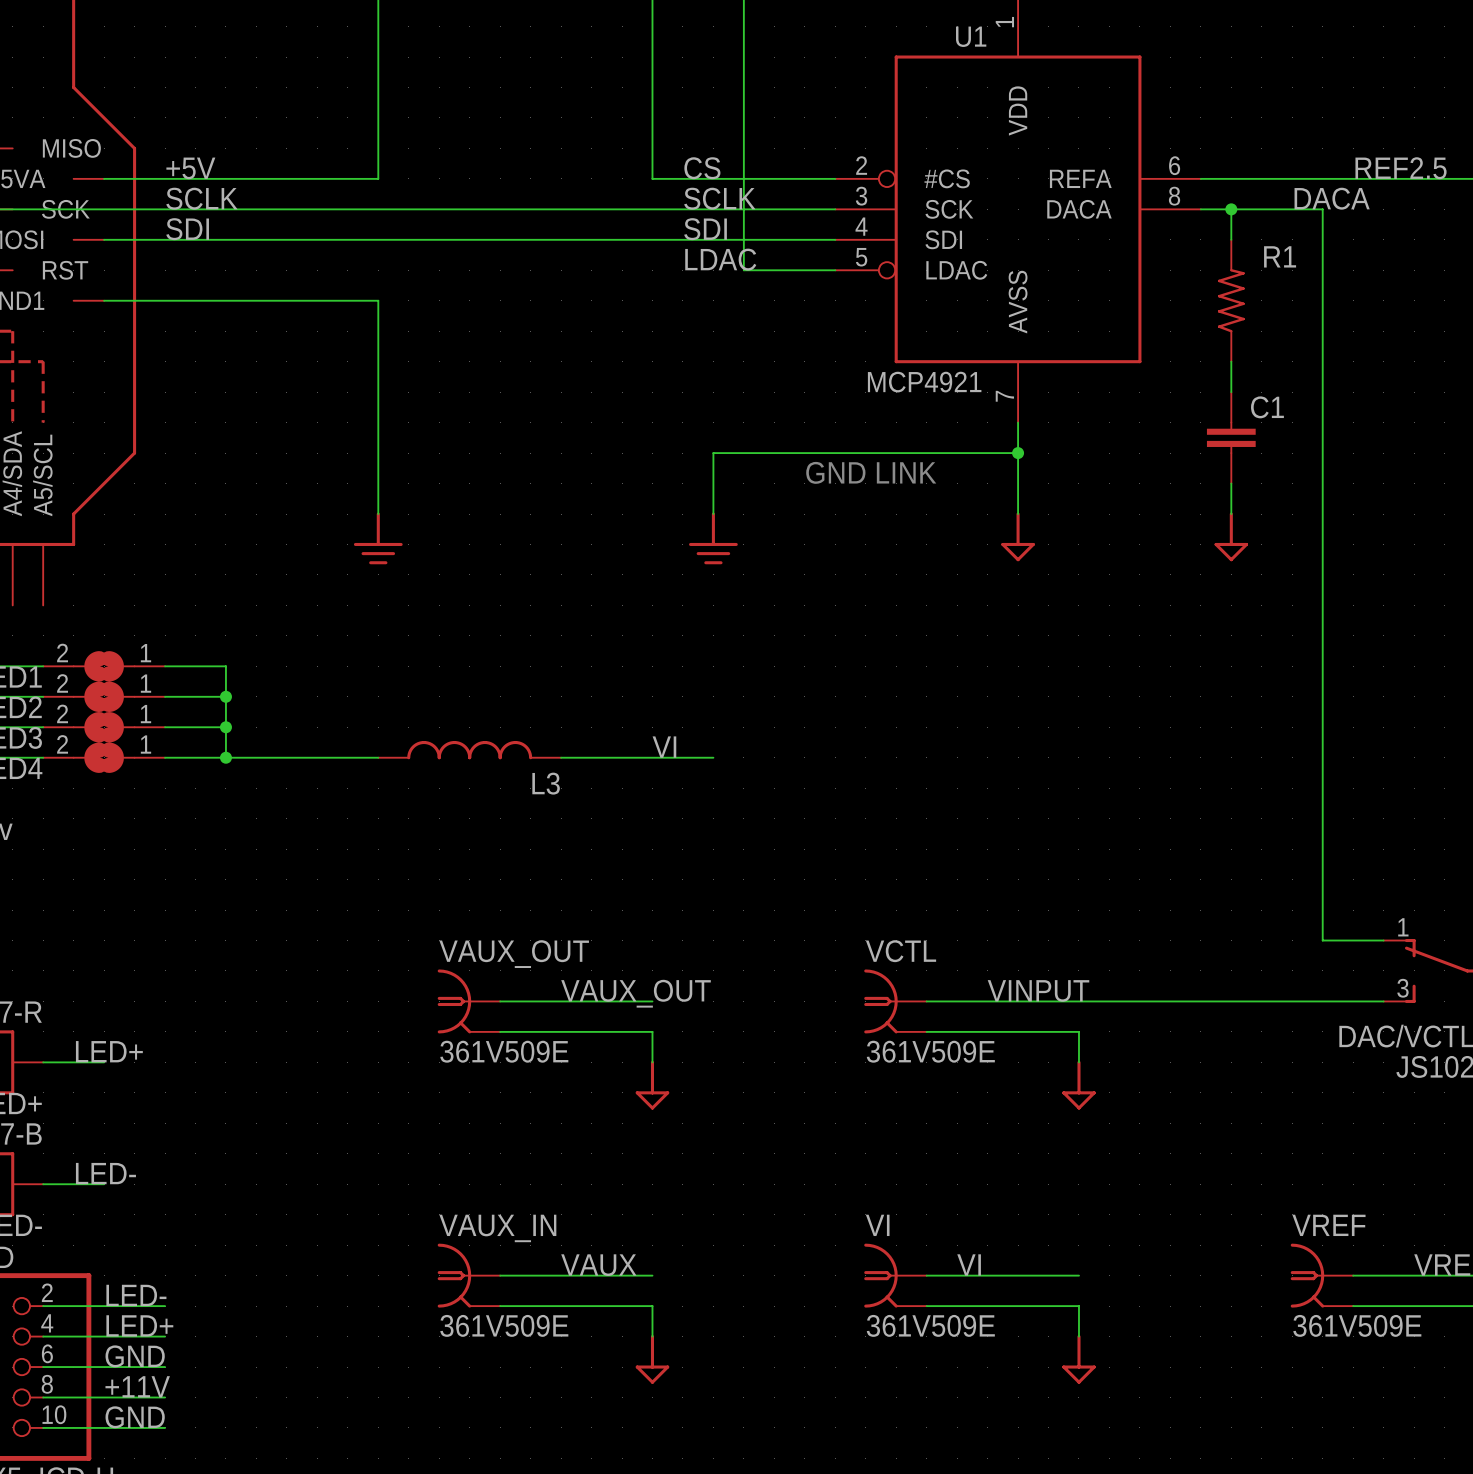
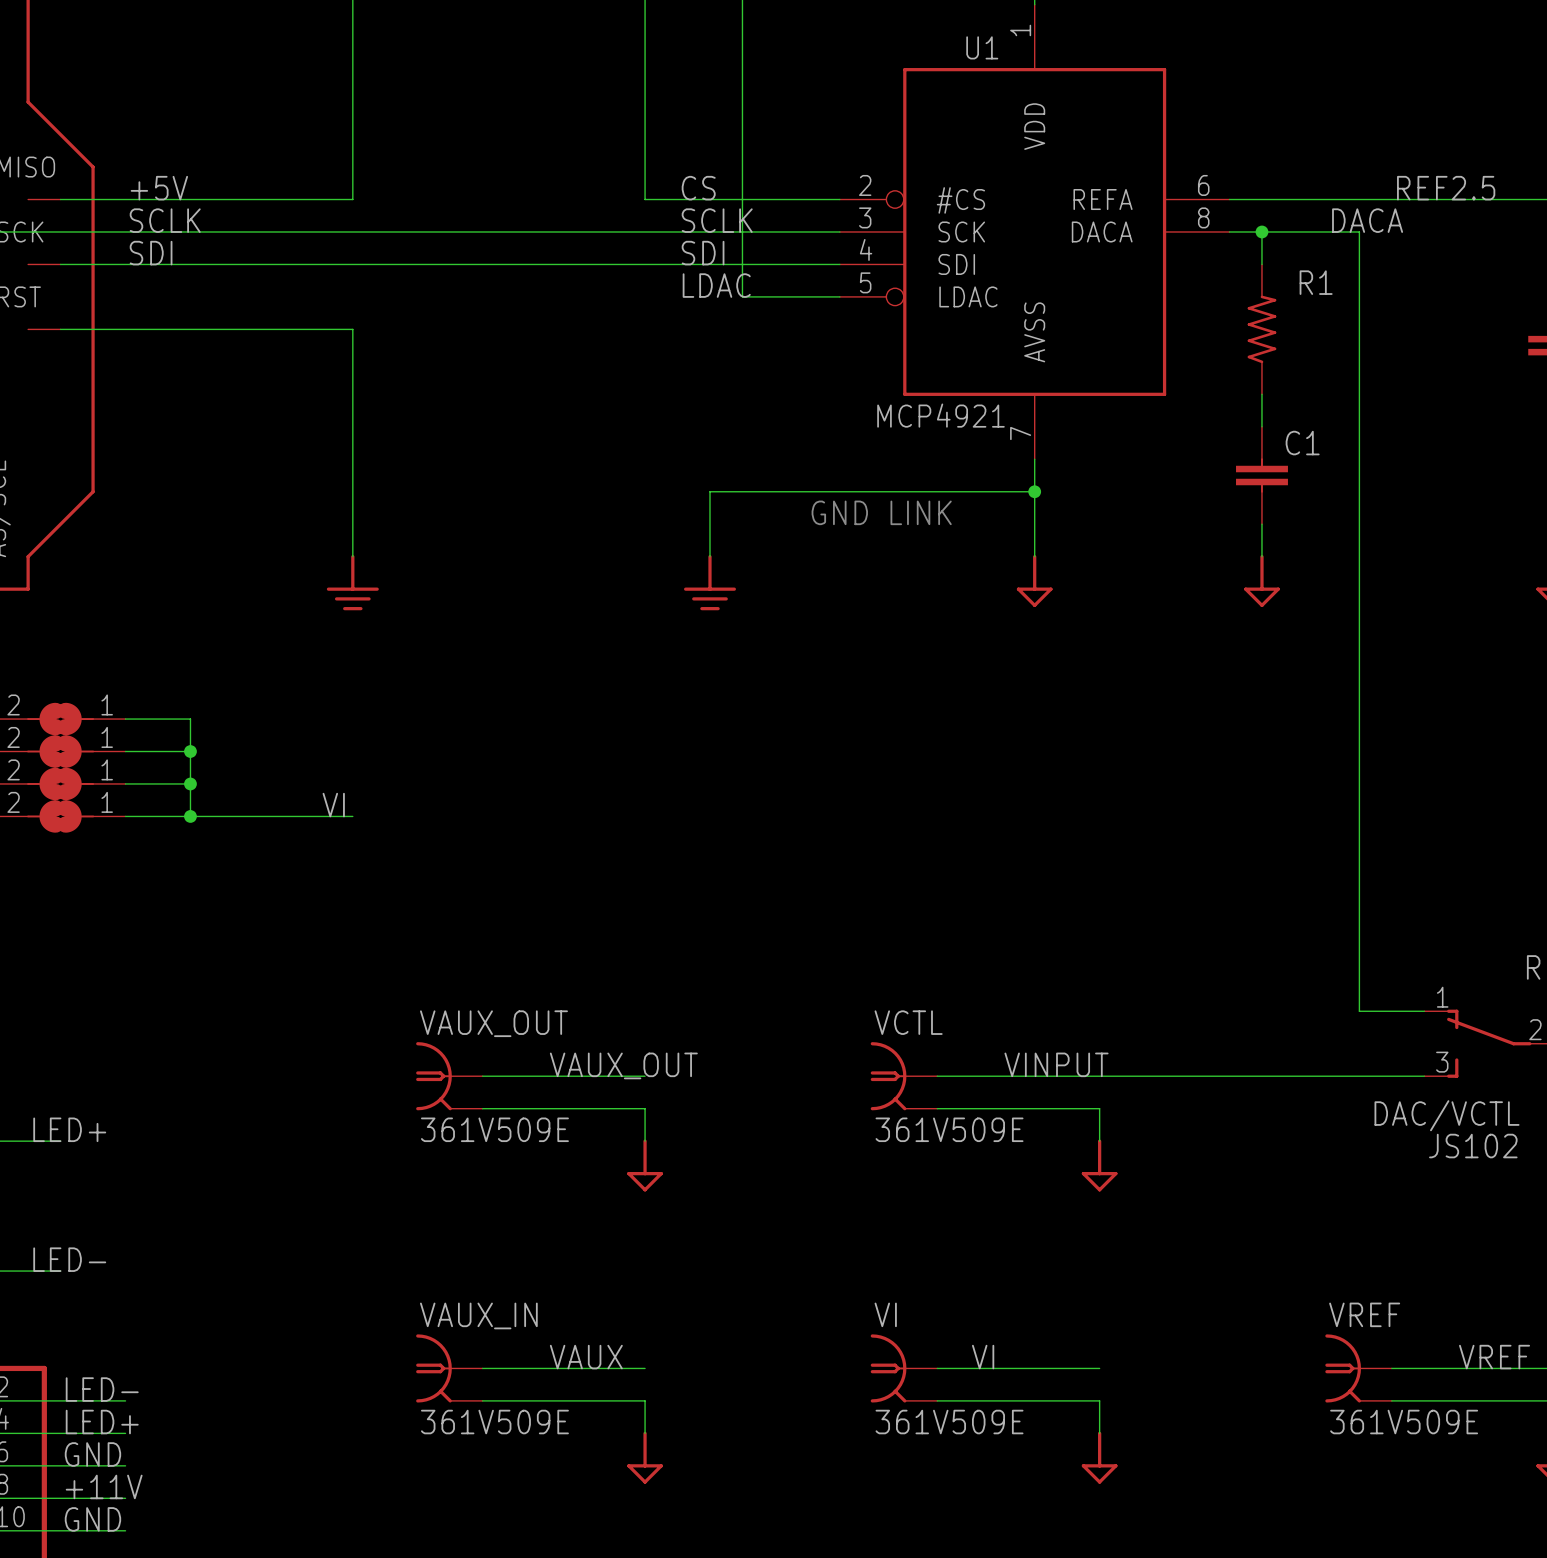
label: none -> VI (333, 805)
label: VI (664, 747) -> none
L3: (469, 750) -> none
wire: (561, 757) (713, 757) -> none

